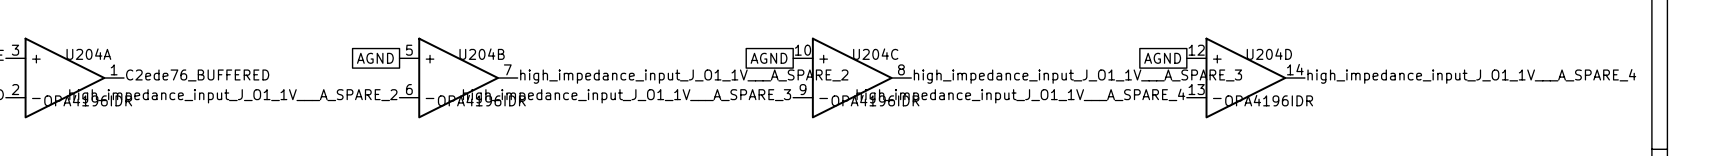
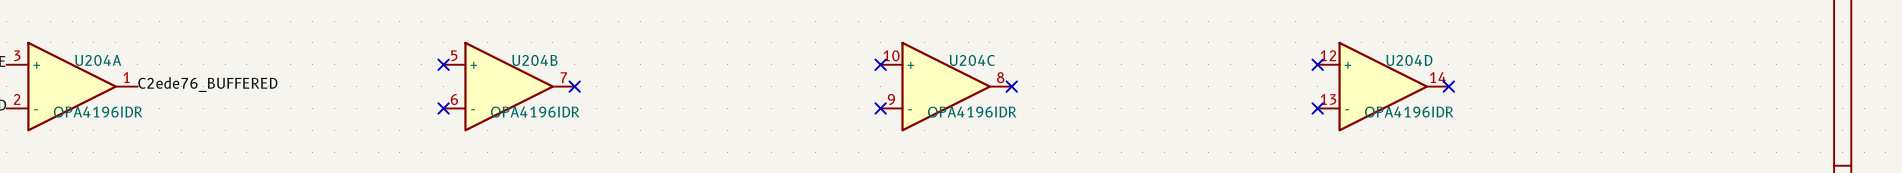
global label: AGND (375, 58) -> none
no-connect mark: none -> (443, 64)
global label: AGND (769, 58) -> none
no-connect mark: none -> (880, 64)
global label: AGND (1162, 58) -> none
no-connect mark: none -> (1317, 64)
label: high_impedance_input_J_O1_1V___A_SPARE_2 (684, 76) -> none
label: high_impedance_input_J_O1_1V___A_SPARE_3 (1077, 76) -> none
label: high_impedance_input_J_O1_1V___A_SPARE_4 (1471, 76) -> none
no-connect mark: none -> (574, 86)
no-connect mark: none -> (1011, 86)
no-connect mark: none -> (1448, 86)
label: high_impedance_input_J_O1_1V___A_SPARE_2 (233, 96) -> none
label: high_impedance_input_J_O1_1V___A_SPARE_3 (626, 96) -> none
label: high_impedance_input_J_O1_1V___A_SPARE_4 (1020, 96) -> none
no-connect mark: none -> (443, 108)
no-connect mark: none -> (880, 108)
no-connect mark: none -> (1317, 108)

